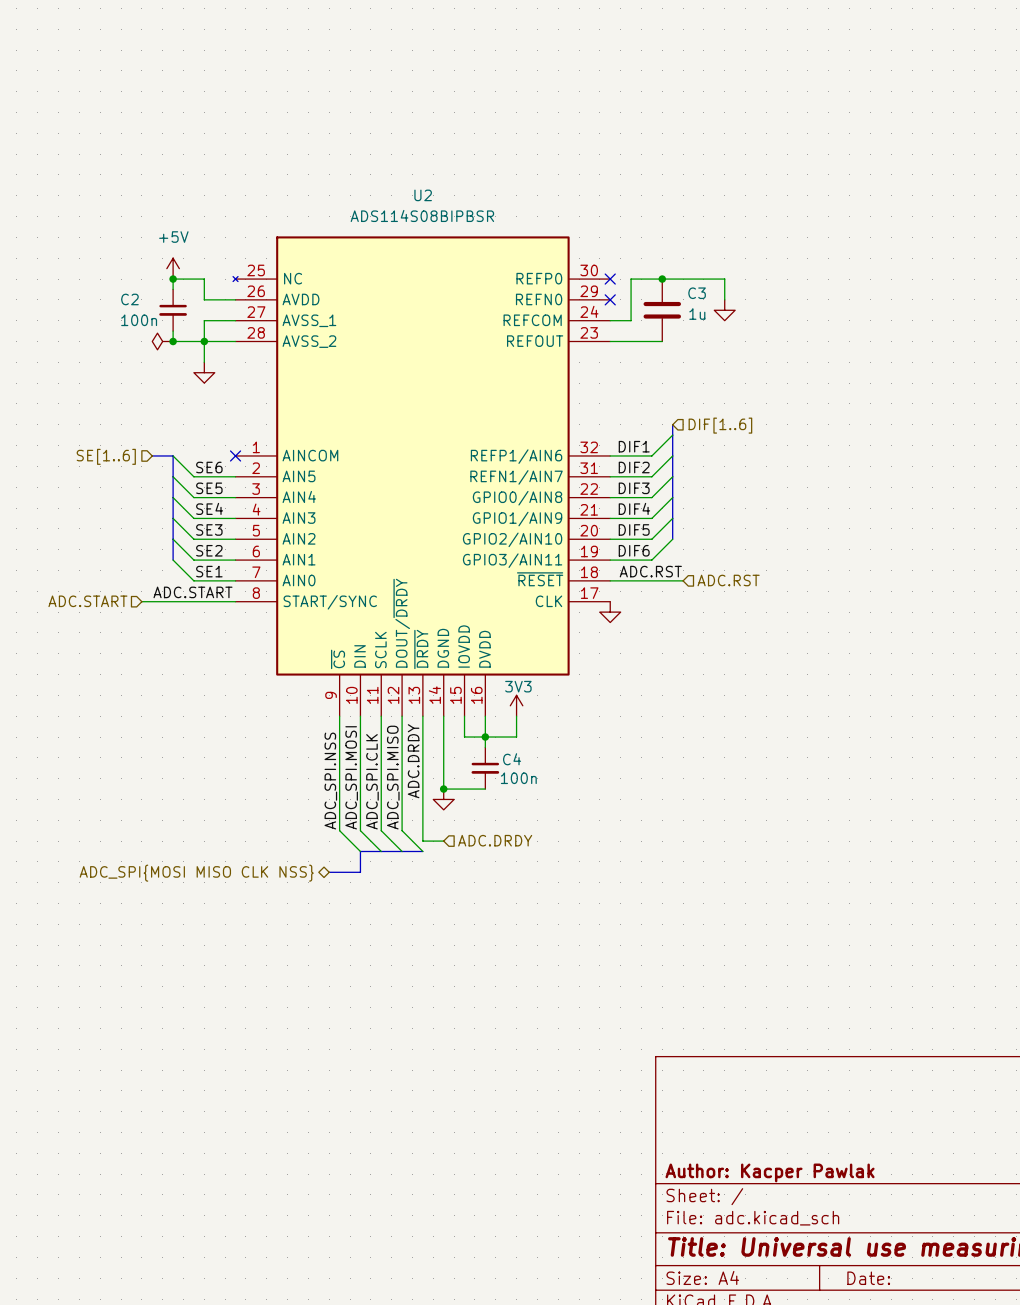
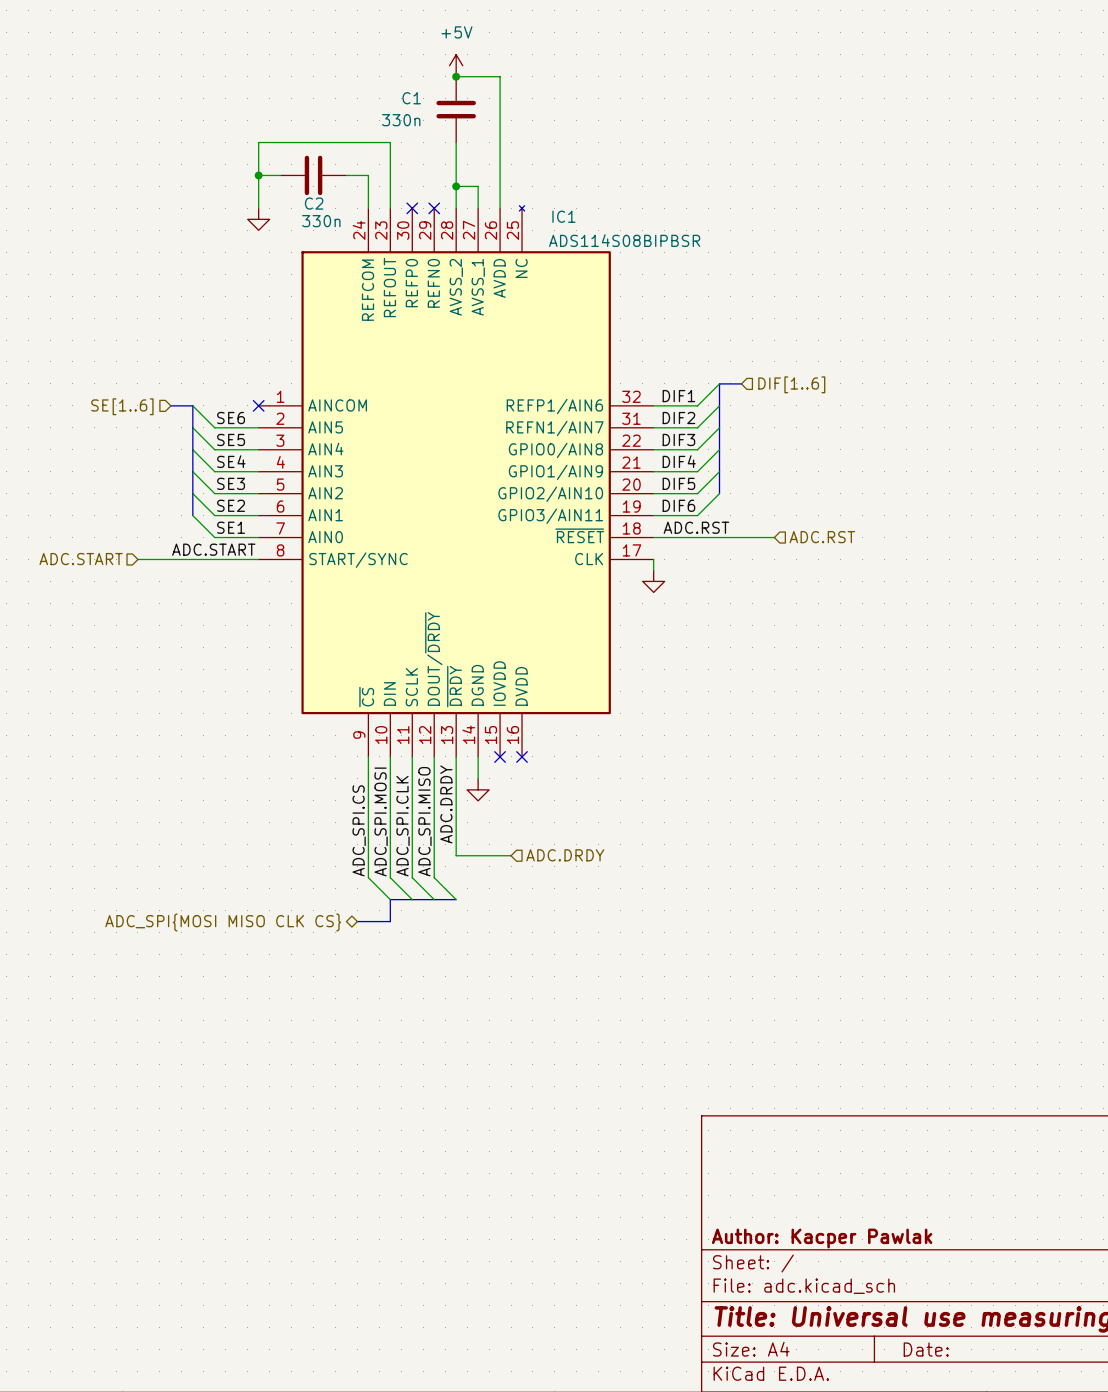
power symbol: none -> +5V (456, 65)
wire: none -> (456, 76) (500, 76) (500, 208)
junction: none -> (456, 76)
C1: none -> 330n (456, 109)
wire: none -> (456, 142) (456, 208)
wire: none -> (258, 175) (280, 175)
junction: none -> (258, 175)
wire: none -> (346, 175) (368, 175) (368, 208)
wire: none -> (456, 186) (478, 186) (478, 208)
junction: none -> (456, 186)
wire: none -> (258, 208) (258, 142) (390, 142) (390, 208)
no-connect mark: none -> (412, 208)
no-connect mark: none -> (434, 208)
power symbol: +5V (173, 268) -> none
junction: (173, 279) -> none
no-connect mark: (610, 279) -> none
junction: (662, 279) -> none
C2 symbol: [159, 289, 187, 332] -> [280, 155, 347, 196]
wire: (173, 289) (173, 279) (204, 279) (204, 299) (235, 299) -> none
C2 name position: C2 (129, 299) -> C2 (314, 203)
no-connect mark: (610, 299) -> none
wire: (724, 299) (724, 279) (631, 279) (631, 320) (610, 320) -> none
C3: 1u (662, 310) -> none
power symbol: (724, 310) -> none
C2 value: 100n (139, 320) -> 330n (321, 221)
wire: (235, 320) (204, 320) (204, 362) -> none
wire: (173, 331) (173, 341) (235, 341) -> none
power symbol: (162, 341) -> none
junction: (173, 341) -> none
junction: (204, 341) -> none
wire: (610, 341) (662, 341) -> none
bus: none -> (741, 383) (719, 383) (719, 449)
power symbol position: (204, 372) -> (258, 219)
no-connect mark: none -> (258, 405)
hierarchical label position: DIF[1..6] (720, 425) -> DIF[1..6] (791, 384)
wire: (672, 435) (651, 455) (610, 455) -> (719, 383) (697, 405) (653, 405)
wire: none -> (719, 471) (697, 493) (653, 493)
label position: DIF1 (634, 446) -> DIF1 (678, 396)
IC1: none -> ADS114S08BIPBSR (456, 481)
bus: (152, 455) (173, 455) -> (170, 405) (192, 405) (192, 482)
wire: (173, 455) (193, 476) (235, 476) -> (192, 405) (214, 427) (258, 427)
no-connect mark: (235, 455) -> none
wire: (672, 455) (651, 476) (610, 476) -> (719, 405) (697, 427) (653, 427)
hierarchical label position: SE[1..6] (106, 456) -> SE[1..6] (122, 406)
bus: (672, 466) (672, 539) -> none
label position: SE6 (209, 467) -> SE6 (231, 418)
label position: DIF2 (634, 467) -> DIF2 (678, 418)
wire: (173, 476) (193, 497) (235, 497) -> (192, 427) (214, 449) (258, 449)
U2: ADS114S08BIPBSR (421, 476) -> none
wire: (672, 476) (651, 497) (610, 497) -> (719, 427) (697, 449) (653, 449)
bus: (173, 487) (173, 560) -> none
label position: SE5 (209, 488) -> SE5 (231, 439)
label position: DIF3 (634, 488) -> DIF3 (678, 439)
wire: (173, 497) (193, 518) (235, 518) -> (192, 449) (214, 471) (258, 471)
wire: (672, 497) (651, 518) (610, 518) -> (719, 449) (697, 471) (653, 471)
label position: SE4 (209, 508) -> SE4 (231, 461)
wire: none -> (653, 537) (774, 537)
label position: DIF4 (634, 508) -> DIF4 (679, 461)
wire: (173, 518) (193, 539) (235, 539) -> (192, 471) (214, 493) (258, 493)
wire: (672, 518) (651, 539) (610, 539) -> (653, 559) (653, 570)
wire: none -> (137, 559) (258, 559)
label position: SE3 (209, 529) -> SE3 (231, 483)
label position: DIF5 (634, 529) -> DIF5 (678, 483)
wire: (173, 539) (193, 560) (235, 560) -> (192, 493) (214, 515) (258, 515)
wire: (672, 539) (651, 560) (610, 560) -> (719, 493) (697, 515) (653, 515)
label position: SE2 (209, 550) -> SE2 (231, 505)
label position: DIF6 (634, 550) -> DIF6 (678, 505)
wire: (173, 560) (193, 580) (235, 580) -> (192, 515) (214, 537) (258, 537)
label position: SE1 (209, 571) -> SE1 (231, 527)
label position: ADC.RST (650, 571) -> ADC.RST (696, 527)
wire: (610, 580) (683, 580) -> none
hierarchical label position: ADC.RST (728, 580) -> ADC.RST (822, 537)
label position: ADC.START (193, 592) -> ADC.START (213, 549)
hierarchical label position: ADC.START (87, 601) -> ADC.START (81, 559)
wire: (141, 601) (235, 601) -> none
power symbol position: (610, 612) -> (653, 581)
power symbol: 3V3 (516, 705) -> none
wire: (464, 716) (464, 737) (516, 737) (516, 716) -> none
no-connect mark: none -> (500, 756)
wire: (485, 716) (485, 747) -> none
no-connect mark: none -> (522, 756)
wire: (443, 737) (443, 789) (485, 789) -> none
junction: (485, 737) -> none
C4: 100n (485, 768) -> none
label: ADC_SPI.NSS (330, 781) -> ADC_SPI.CS (359, 830)
junction: (443, 789) -> none
power symbol position: (443, 799) -> (478, 789)
wire: (422, 809) (422, 841) (443, 841) -> (456, 855) (511, 855)
hierarchical label position: ADC.DRDY (495, 840) -> ADC.DRDY (565, 855)
hierarchical label: ADC_SPI{MOSI MISO CLK NSS} (196, 873) -> ADC_SPI{MOSI MISO CLK CS} (223, 922)

